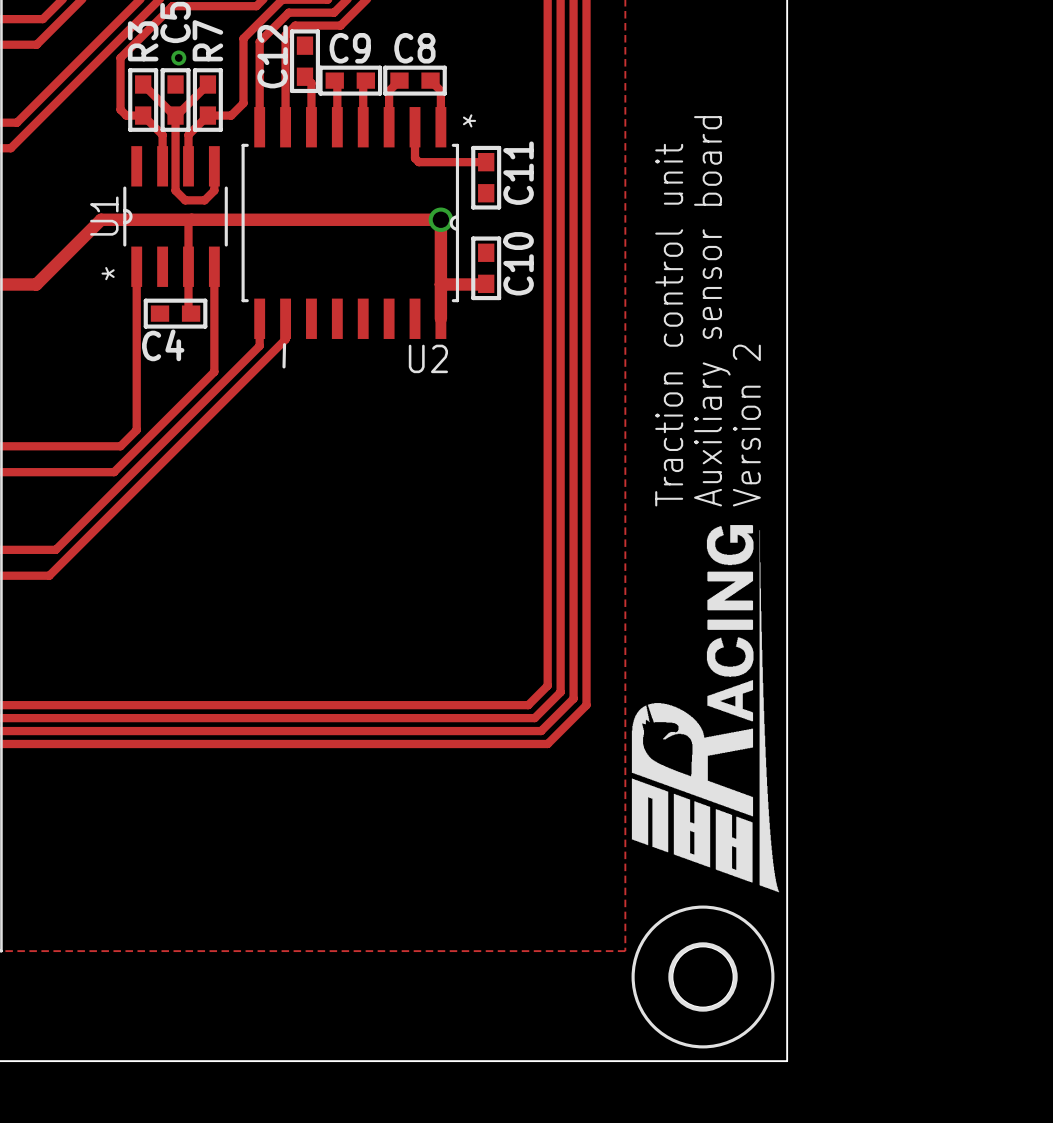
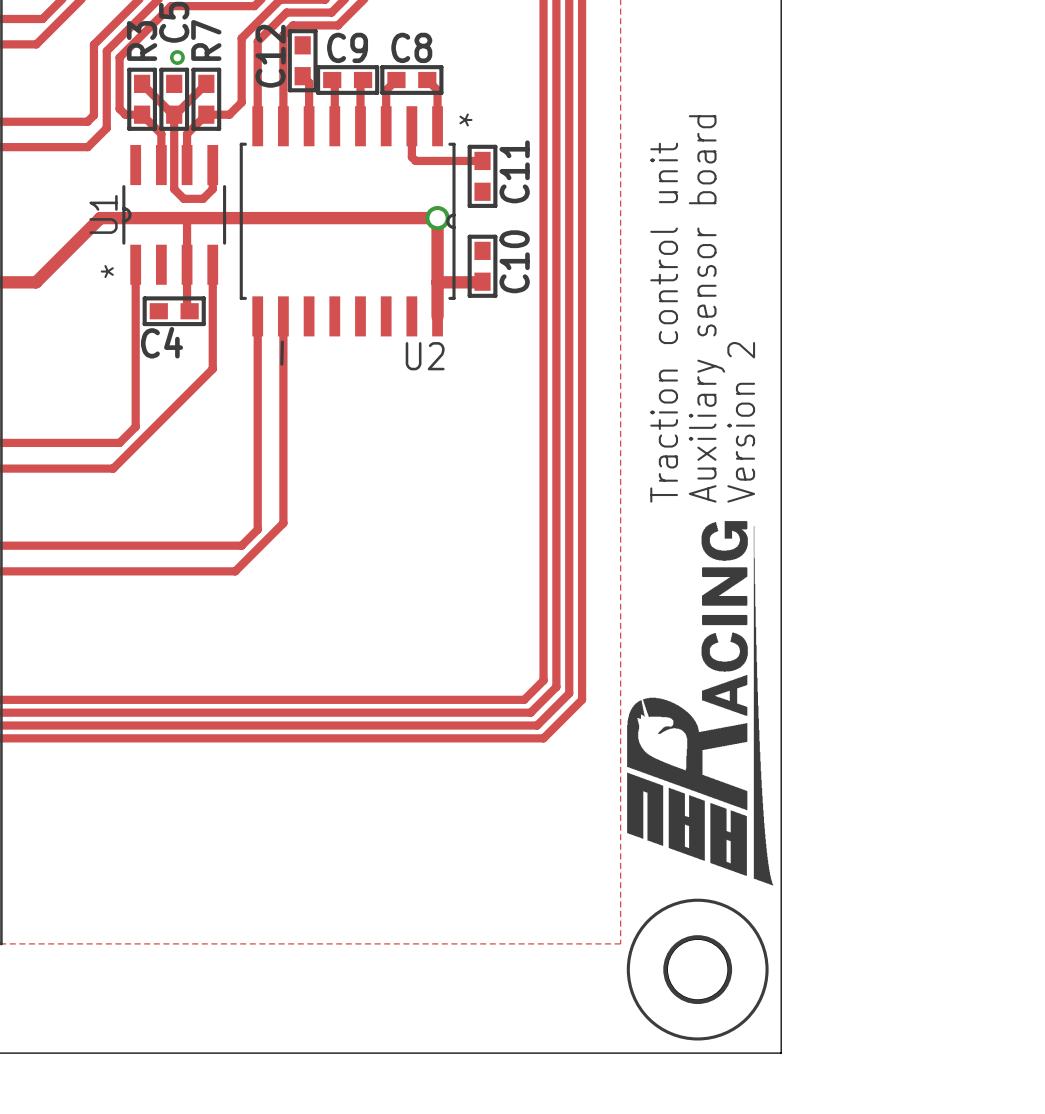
track: (94, 45) (16, 122) -> (93, 44) (93, 115) (87, 121) (16, 121)
track: (107, 51) (10, 148) -> (106, 51) (106, 128) (87, 147) (10, 147)
track: (285, 339) (49, 575) -> (283, 336) (283, 523) (235, 571) (48, 571)
track: (259, 345) (55, 549) -> (257, 343) (257, 529) (241, 545) (55, 545)

